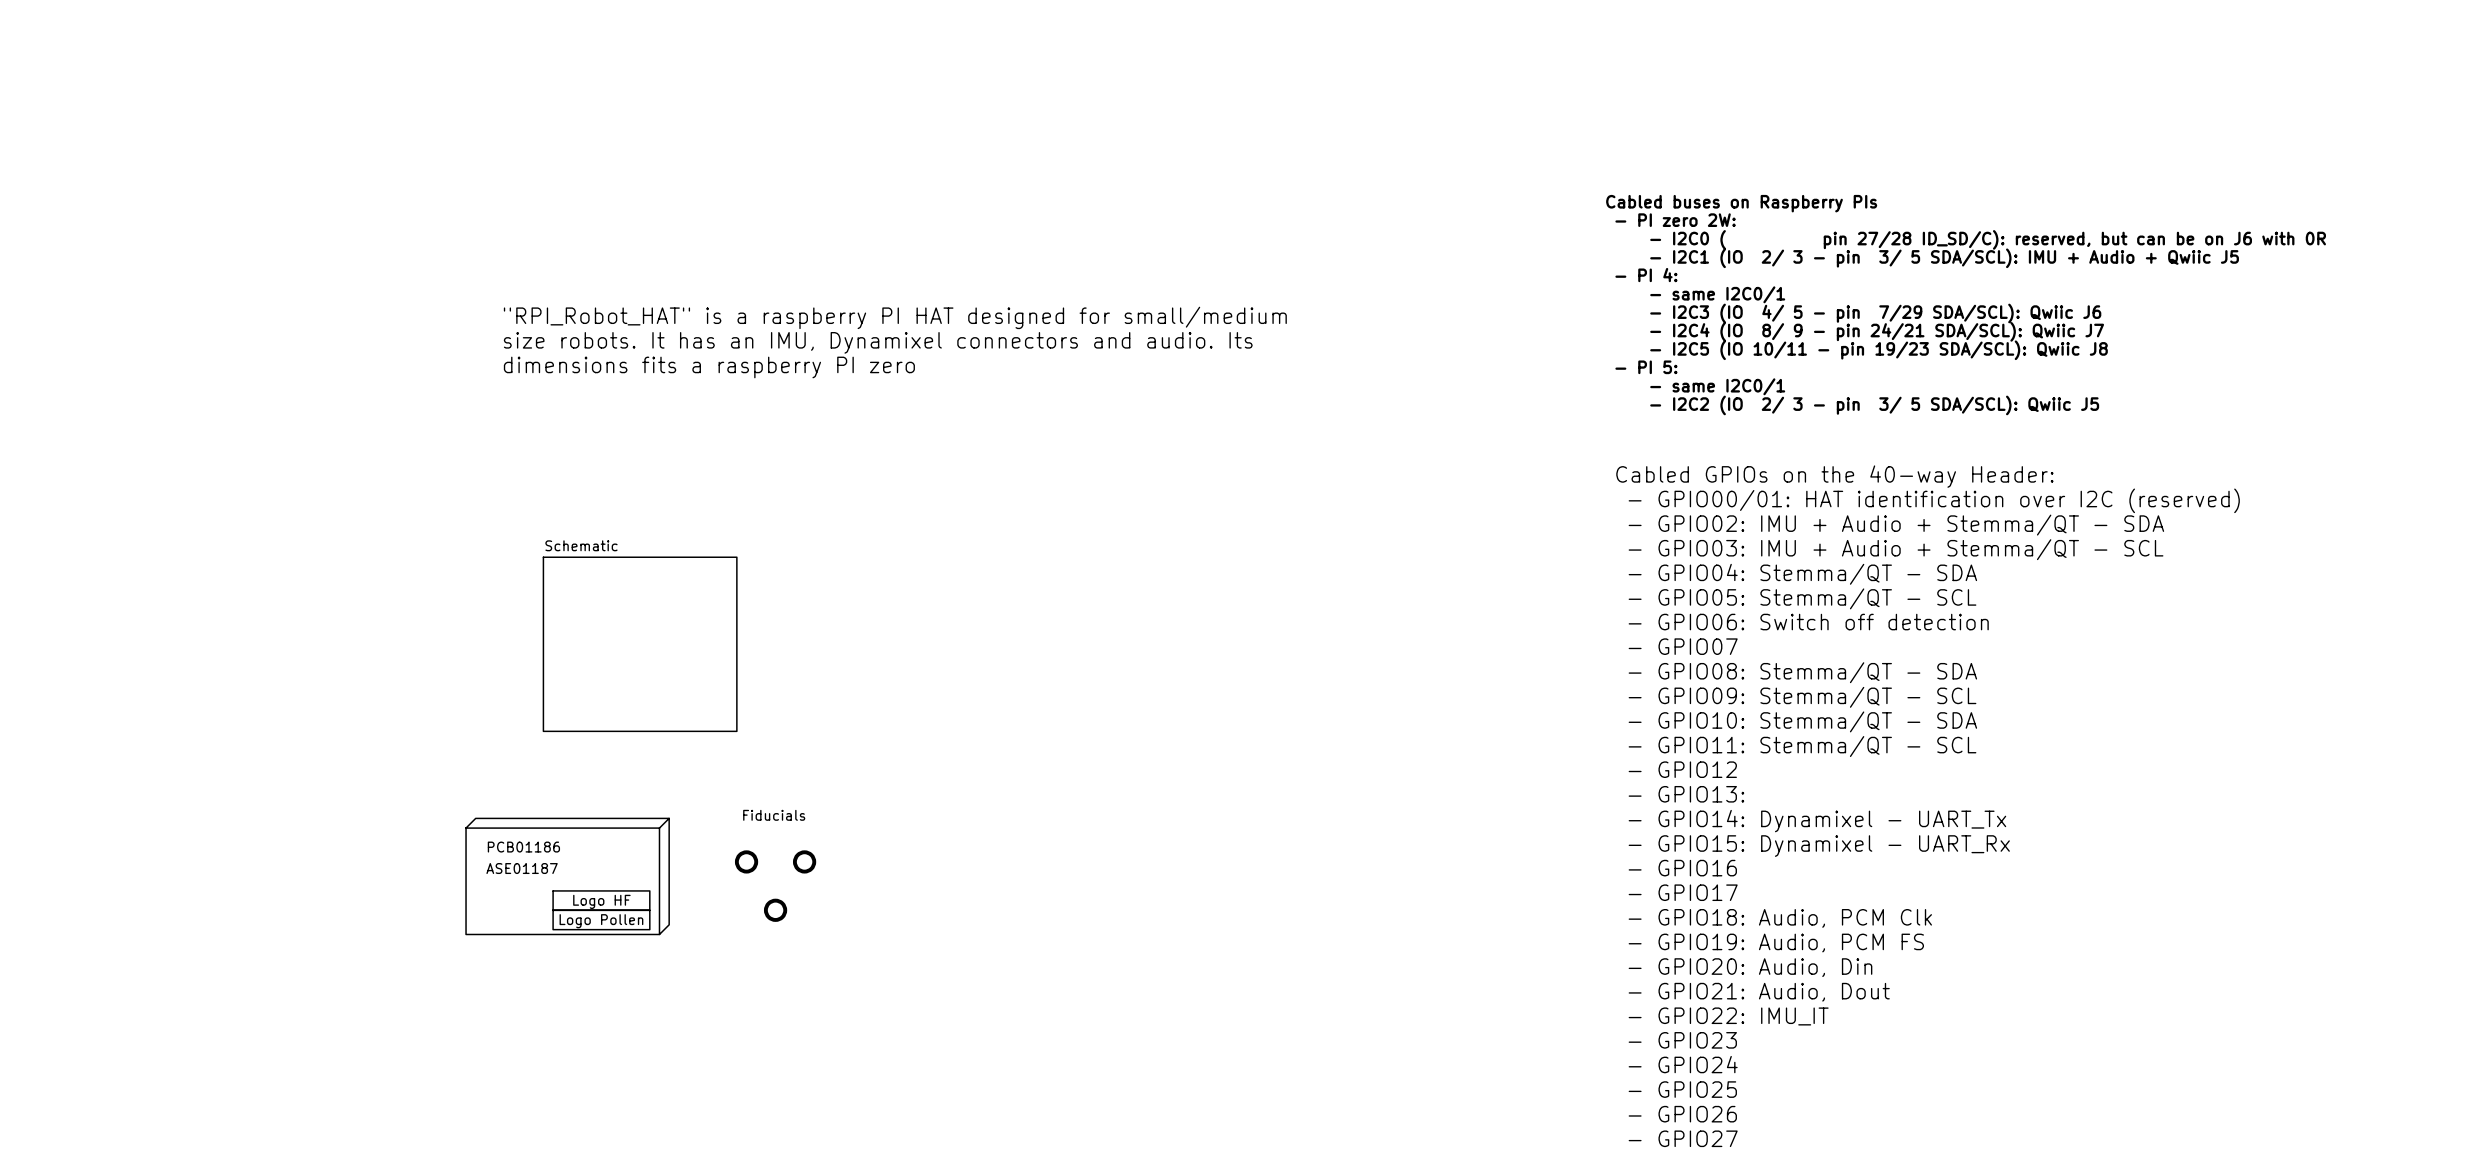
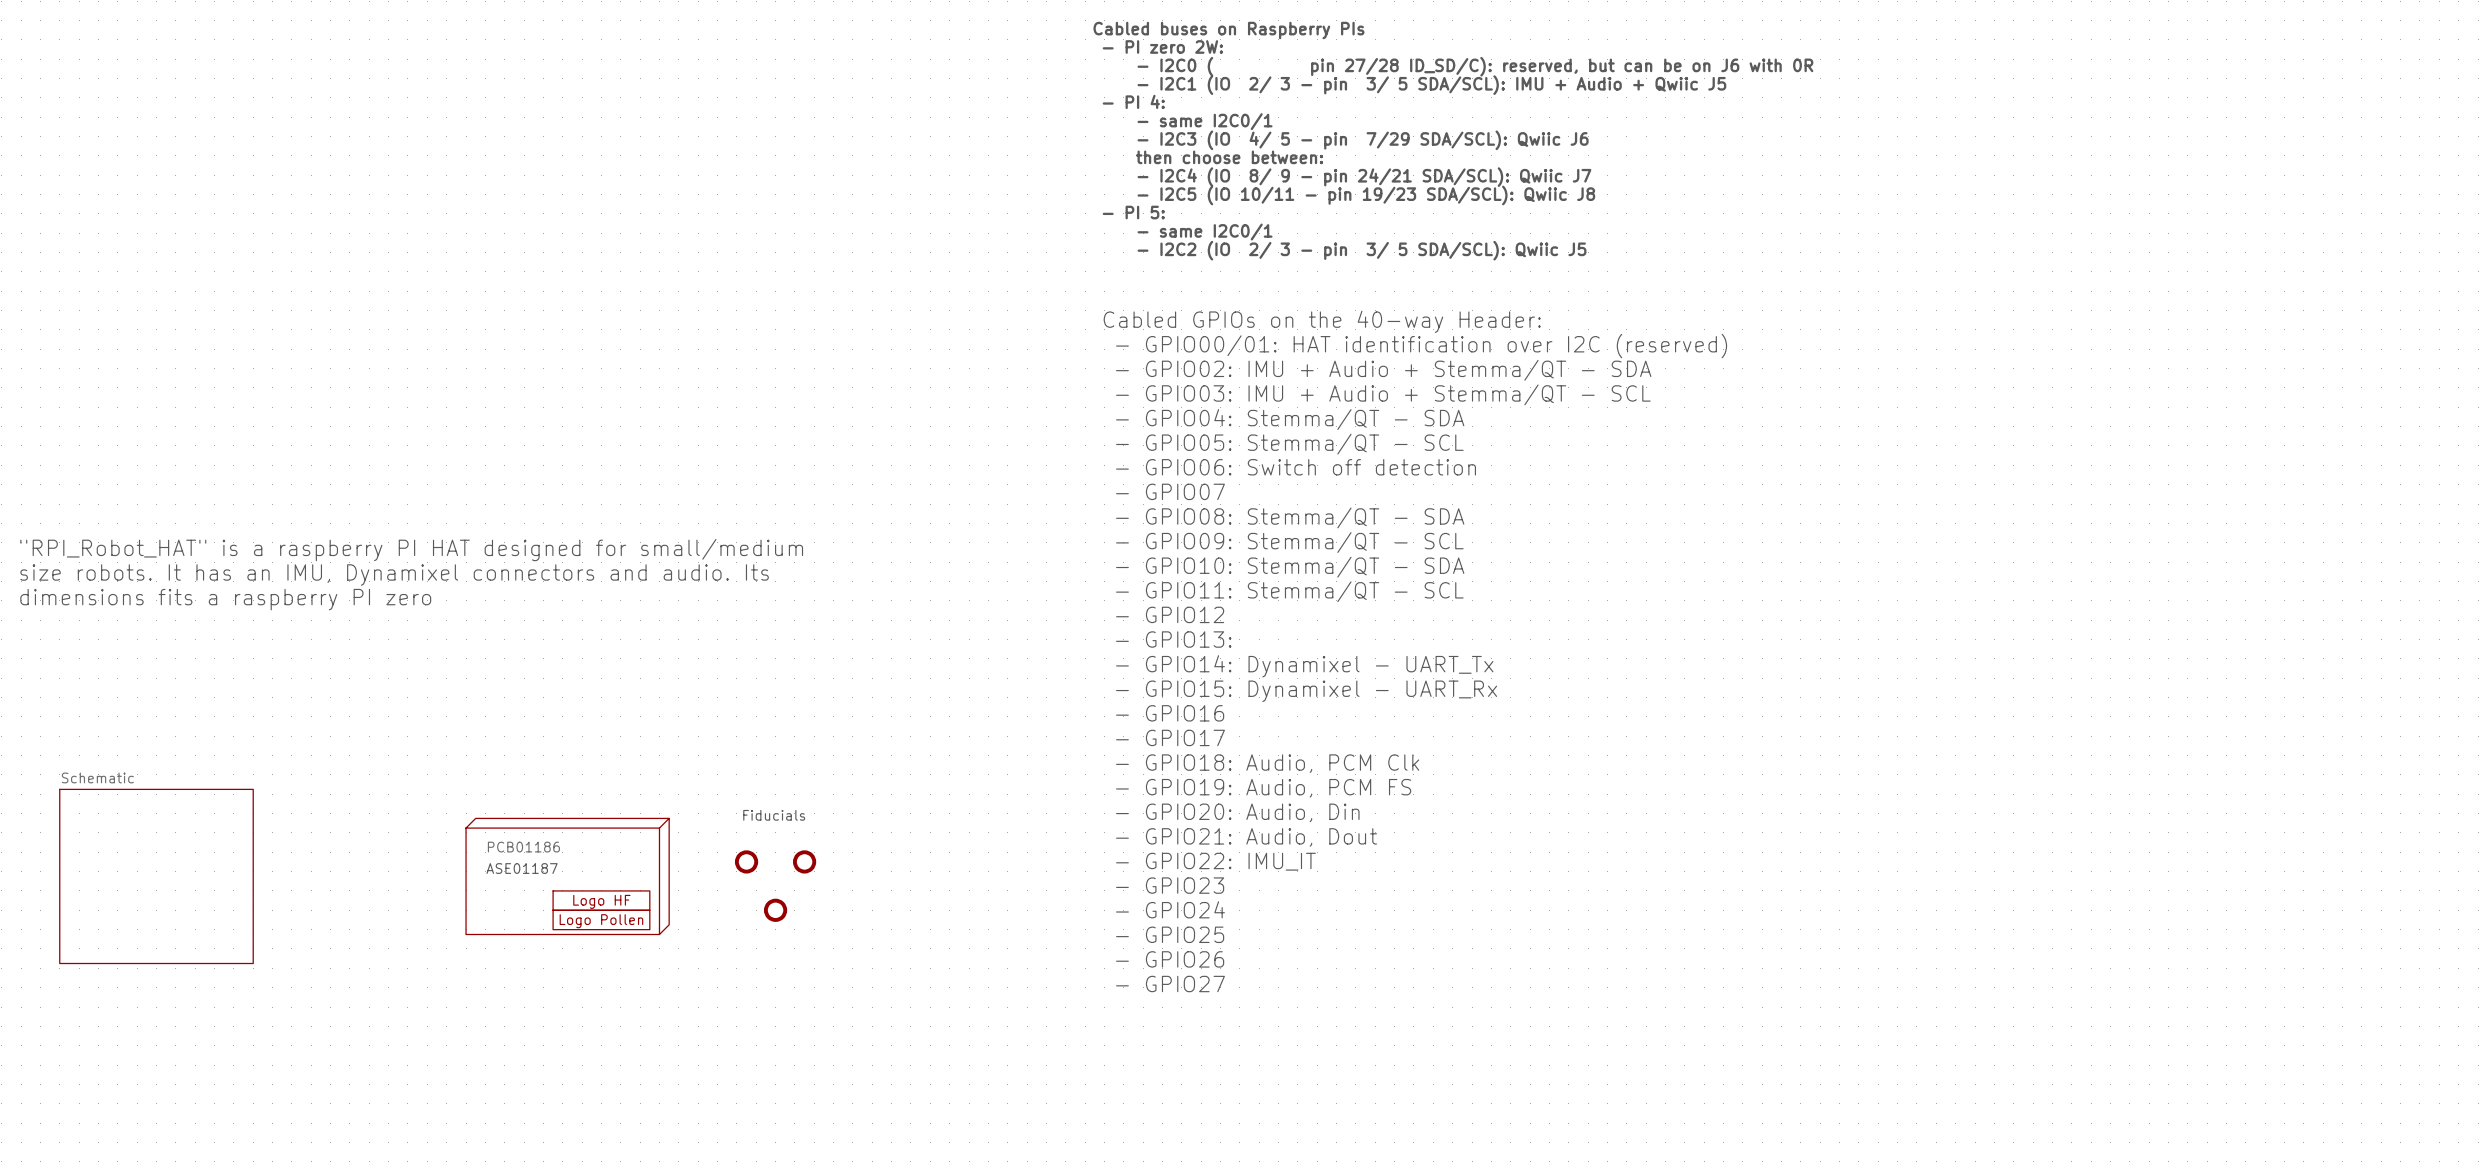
text: none -> Cabled buses on Raspberry PIs (1228, 30)
text: none -> - PI zero 2W: (1162, 46)
text: none -> - I2C0 ( pin 27/28 ID_SD/C): reserved, but can be on J6 with 0R (1475, 66)
text: none -> - I2C1 (IO 2/ 3 - pin 3/ 5 SDA/SCL): IMU + Audio + Qwiic J5 (1431, 85)
text: none -> - PI 4: (1133, 101)
text: none -> - same I2C0/1 (1205, 121)
text: none -> - I2C3 (IO 4/ 5 - pin 7/29 SDA/SCL): Qwiic J6 (1363, 140)
text: none -> then choose between: (1229, 157)
text: none -> - I2C4 (IO 8/ 9 - pin 24/21 SDA/SCL): Qwiic J7 (1364, 177)
text: none -> - I2C5 (IO 10/11 - pin 19/23 SDA/SCL): Qwiic J8 (1366, 195)
text: Cabled buses on Raspberry PIs (1741, 203) -> none
text: none -> - PI 5: (1133, 212)
text: - PI zero 2W: (1675, 220) -> none
text: none -> - same I2C0/1 (1205, 232)
text: - I2C0 ( pin 27/28 ID_SD/C): reserved, but can be on J6 with 0R (1988, 239) -> none
text: none -> - I2C2 (IO 2/ 3 - pin 3/ 5 SDA/SCL): Qwiic J5 (1361, 250)
text: - I2C1 (IO 2/ 3 - pin 3/ 5 SDA/SCL): IMU + Audio + Qwiic J5 (1944, 258) -> none
text: - PI 4: (1646, 275) -> none
text: - same I2C0/1 (1717, 294) -> none
text: - I2C3 (IO 4/ 5 - pin 7/29 SDA/SCL): Qwiic J6 (1875, 313) -> none
text: "RPI_Robot_HAT" is a raspberry PI HAT designed for small/medium (895, 317) -> none
text: none -> Cabled GPIOs on the 40-way Header: (1322, 321)
text: - I2C4 (IO 8/ 9 - pin 24/21 SDA/SCL): Qwiic J7 (1877, 331) -> none
text: size robots. It has an IMU, Dynamixel connectors and audio. Its (878, 342) -> none
text: none -> - GPIO00/01: HAT identification over I2C (reserved) (1421, 346)
text: - I2C5 (IO 10/11 - pin 19/23 SDA/SCL): Qwiic J8 (1879, 350) -> none
text: dimensions fits a raspberry PI zero (709, 367) -> none
text: - PI 5: (1646, 367) -> none
text: none -> - GPIO02: IMU + Audio + Stemma/QT - SDA (1383, 370)
text: - same I2C0/1 (1717, 386) -> none
text: none -> - GPIO03: IMU + Audio + Stemma/QT - SCL (1383, 394)
text: - I2C2 (IO 2/ 3 - pin 3/ 5 SDA/SCL): Qwiic J5 (1874, 405) -> none
text: none -> - GPIO04: Stemma/QT - SDA (1290, 419)
text: none -> - GPIO05: Stemma/QT - SCL (1289, 444)
text: none -> - GPIO06: Switch off detection (1296, 467)
text: Cabled GPIOs on the 40-way Header: (1834, 476) -> none
text: none -> - GPIO07 (1170, 491)
text: - GPIO00/01: HAT identification over I2C (reserved) (1934, 500) -> none
text: none -> - GPIO08: Stemma/QT - SDA (1290, 517)
text: - GPIO02: IMU + Audio + Stemma/QT - SDA (1896, 525) -> none
text: none -> - GPIO09: Stemma/QT - SCL (1289, 542)
text: - GPIO03: IMU + Audio + Stemma/QT - SCL (1896, 549) -> none
text: none -> "RPI_Robot_HAT" is a raspberry PI HAT designed for small/medium (411, 550)
text: none -> - GPIO10: Stemma/QT - SDA (1290, 567)
text: - GPIO04: Stemma/QT - SDA (1802, 574) -> none
text: none -> size robots. It has an IMU, Dynamixel connectors and audio. Its (394, 575)
text: none -> - GPIO11: Stemma/QT - SCL (1289, 591)
text: - GPIO05: Stemma/QT - SCL (1802, 598) -> none
text: none -> dimensions fits a raspberry PI zero (225, 599)
text: none -> - GPIO12 (1170, 614)
text: - GPIO06: Switch off detection (1808, 622) -> none
text: none -> - GPIO13: (1173, 639)
sheet Schematic: (640, 644) -> none
text: - GPIO07 (1683, 646) -> none
text: none -> - GPIO14: Dynamixel - UART_Tx (1304, 666)
text: - GPIO08: Stemma/QT - SDA (1802, 672) -> none
text: none -> - GPIO15: Dynamixel - UART_Rx (1306, 691)
text: - GPIO09: Stemma/QT - SCL (1802, 697) -> none
text: none -> - GPIO16 (1170, 713)
text: - GPIO10: Stemma/QT - SDA (1802, 721) -> none
text: none -> - GPIO17 (1170, 737)
text: - GPIO11: Stemma/QT - SCL (1802, 746) -> none
text: none -> - GPIO18: Audio, PCM Clk (1267, 763)
text: - GPIO12 (1682, 769) -> none
text: none -> - GPIO19: Audio, PCM FS (1263, 788)
text: - GPIO13: (1686, 794) -> none
text: none -> - GPIO20: Audio, Din (1237, 812)
text: - GPIO14: Dynamixel - UART_Tx (1817, 821) -> none
text: none -> - GPIO21: Audio, Dout (1246, 837)
text: - GPIO15: Dynamixel - UART_Rx (1819, 846) -> none
text: none -> - GPIO22: IMU_IT (1215, 861)
text: - GPIO16 (1682, 868) -> none
sheet Schematic: none -> (156, 876)
text: none -> - GPIO23 (1170, 885)
text: - GPIO17 (1683, 892) -> none
text: none -> - GPIO24 (1170, 909)
text: - GPIO18: Audio, PCM Clk (1780, 918) -> none
text: none -> - GPIO25 (1170, 934)
text: - GPIO19: Audio, PCM FS (1776, 943) -> none
text: none -> - GPIO26 (1170, 959)
text: - GPIO20: Audio, Din (1750, 967) -> none
text: none -> - GPIO27 (1170, 984)
text: - GPIO21: Audio, Dout (1759, 992) -> none
text: - GPIO22: IMU_IT (1728, 1016) -> none
text: - GPIO23 (1682, 1040) -> none
text: - GPIO24 (1683, 1064) -> none
text: - GPIO25 (1682, 1089) -> none
text: - GPIO26 (1682, 1114) -> none
text: - GPIO27 (1683, 1138) -> none

